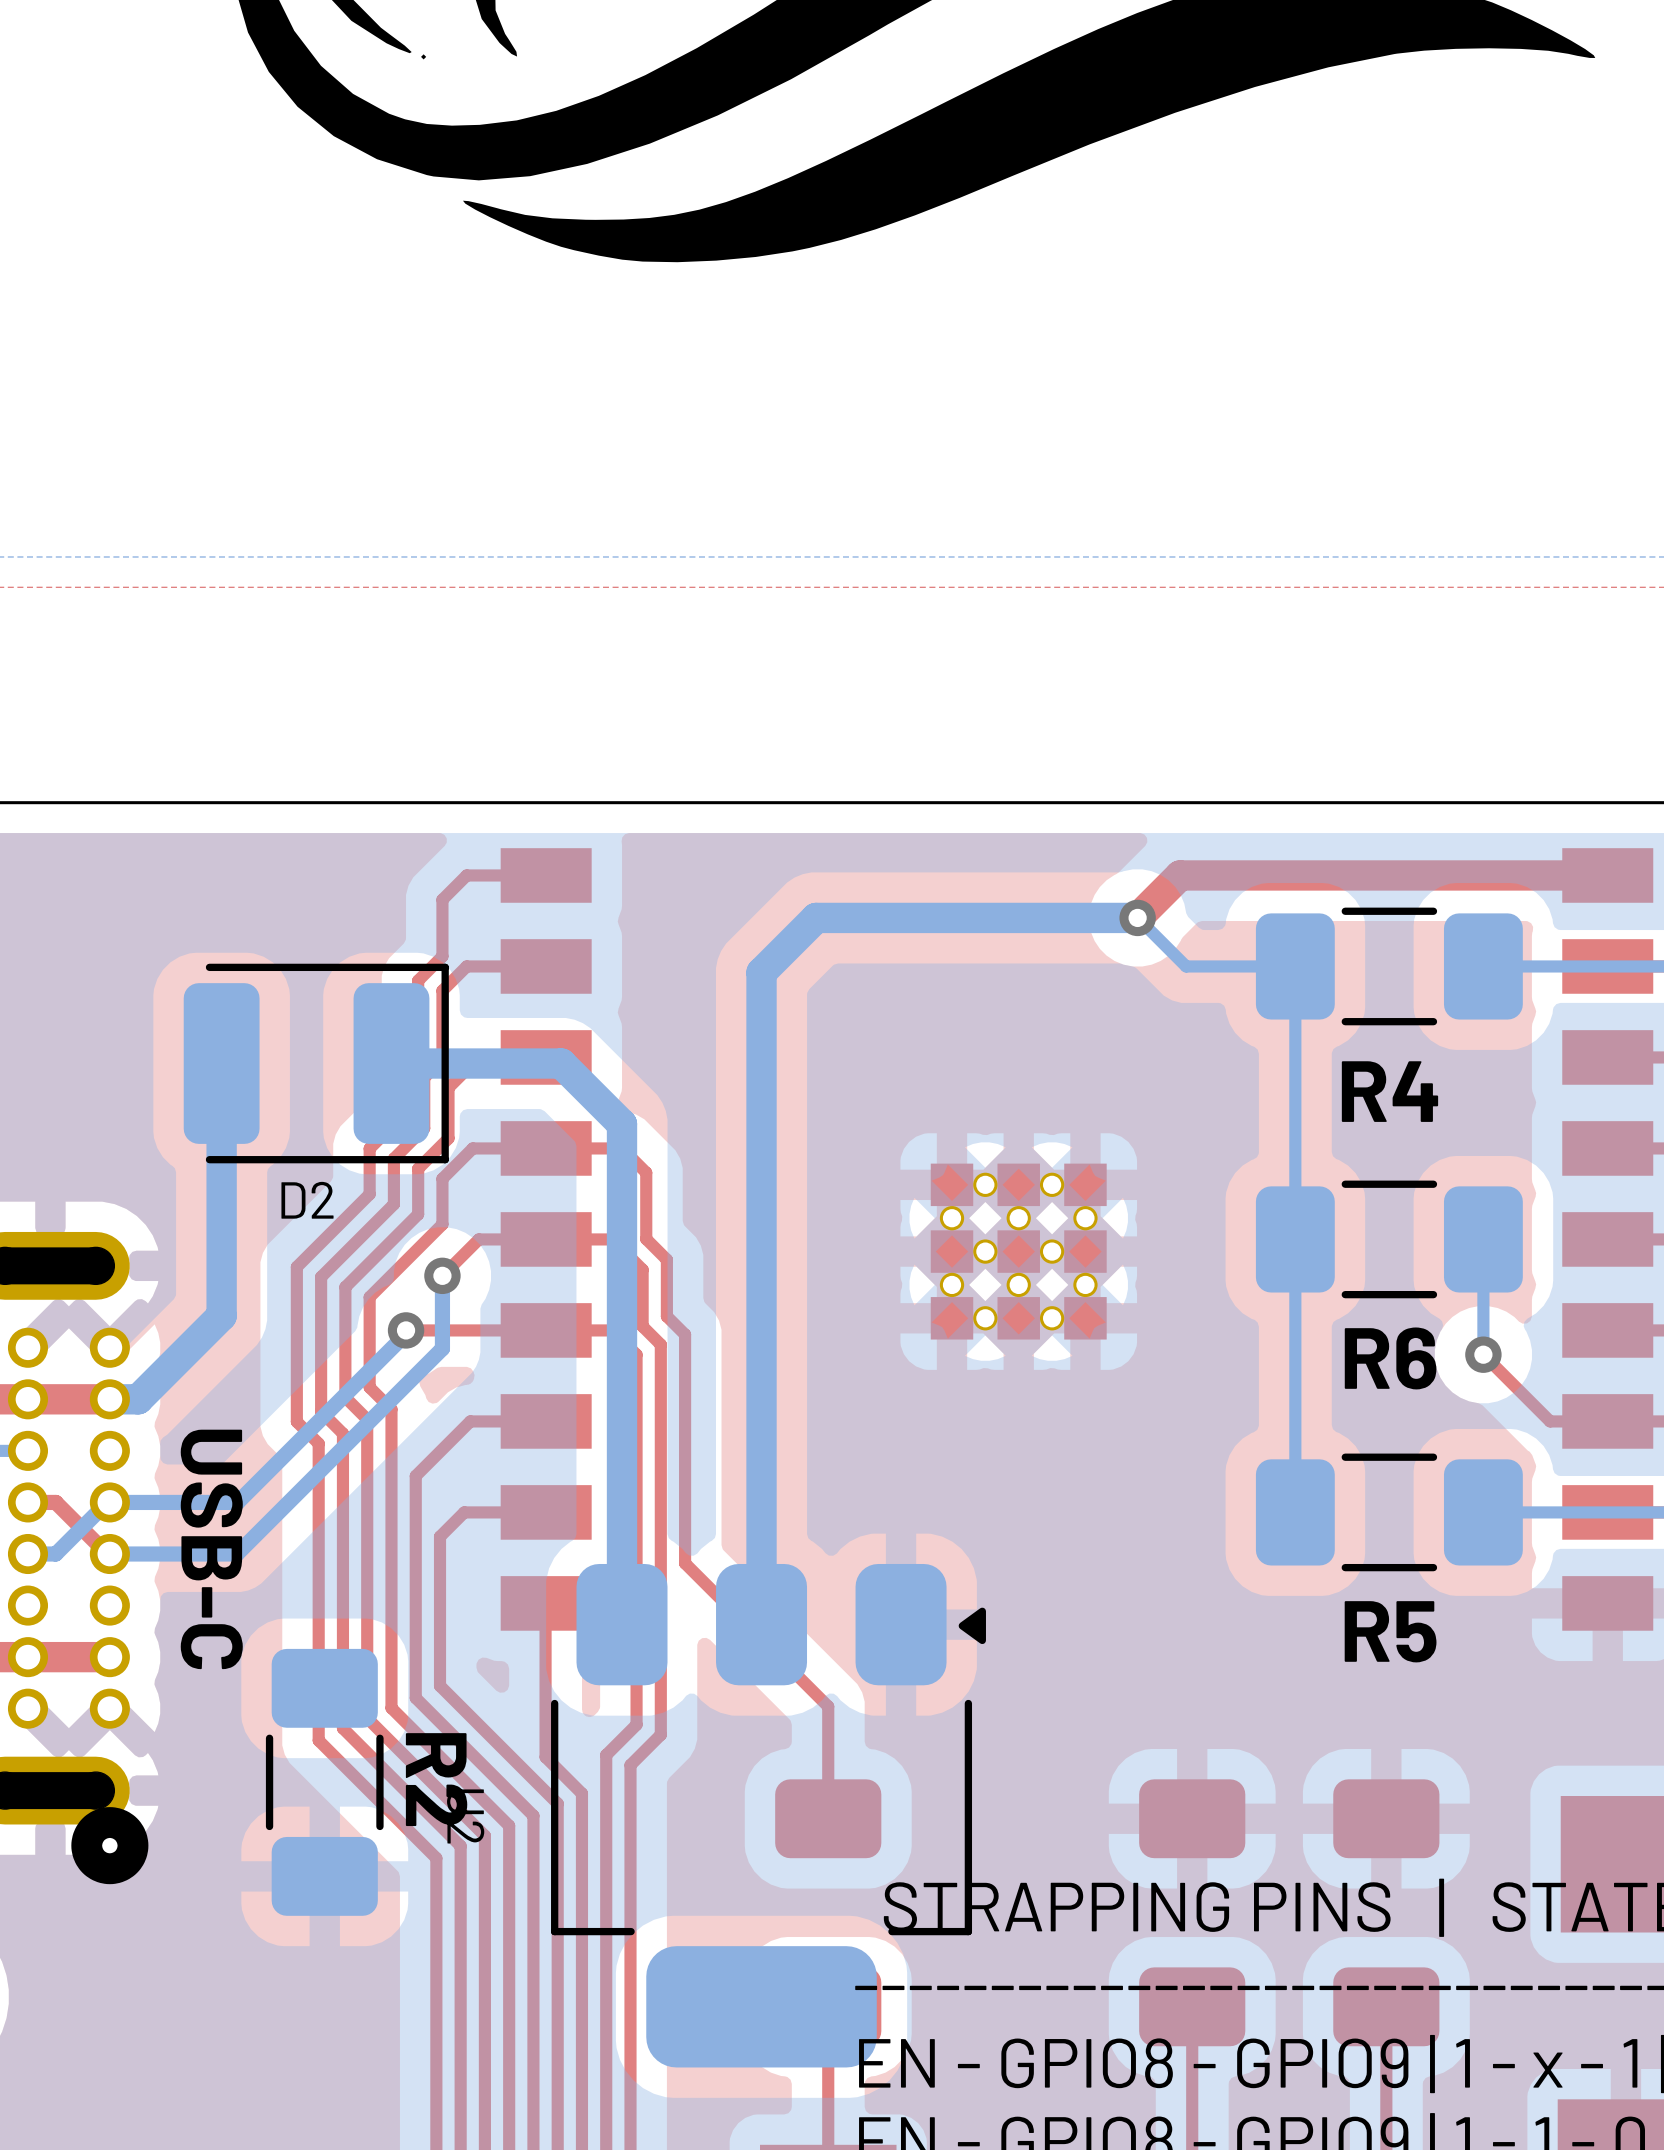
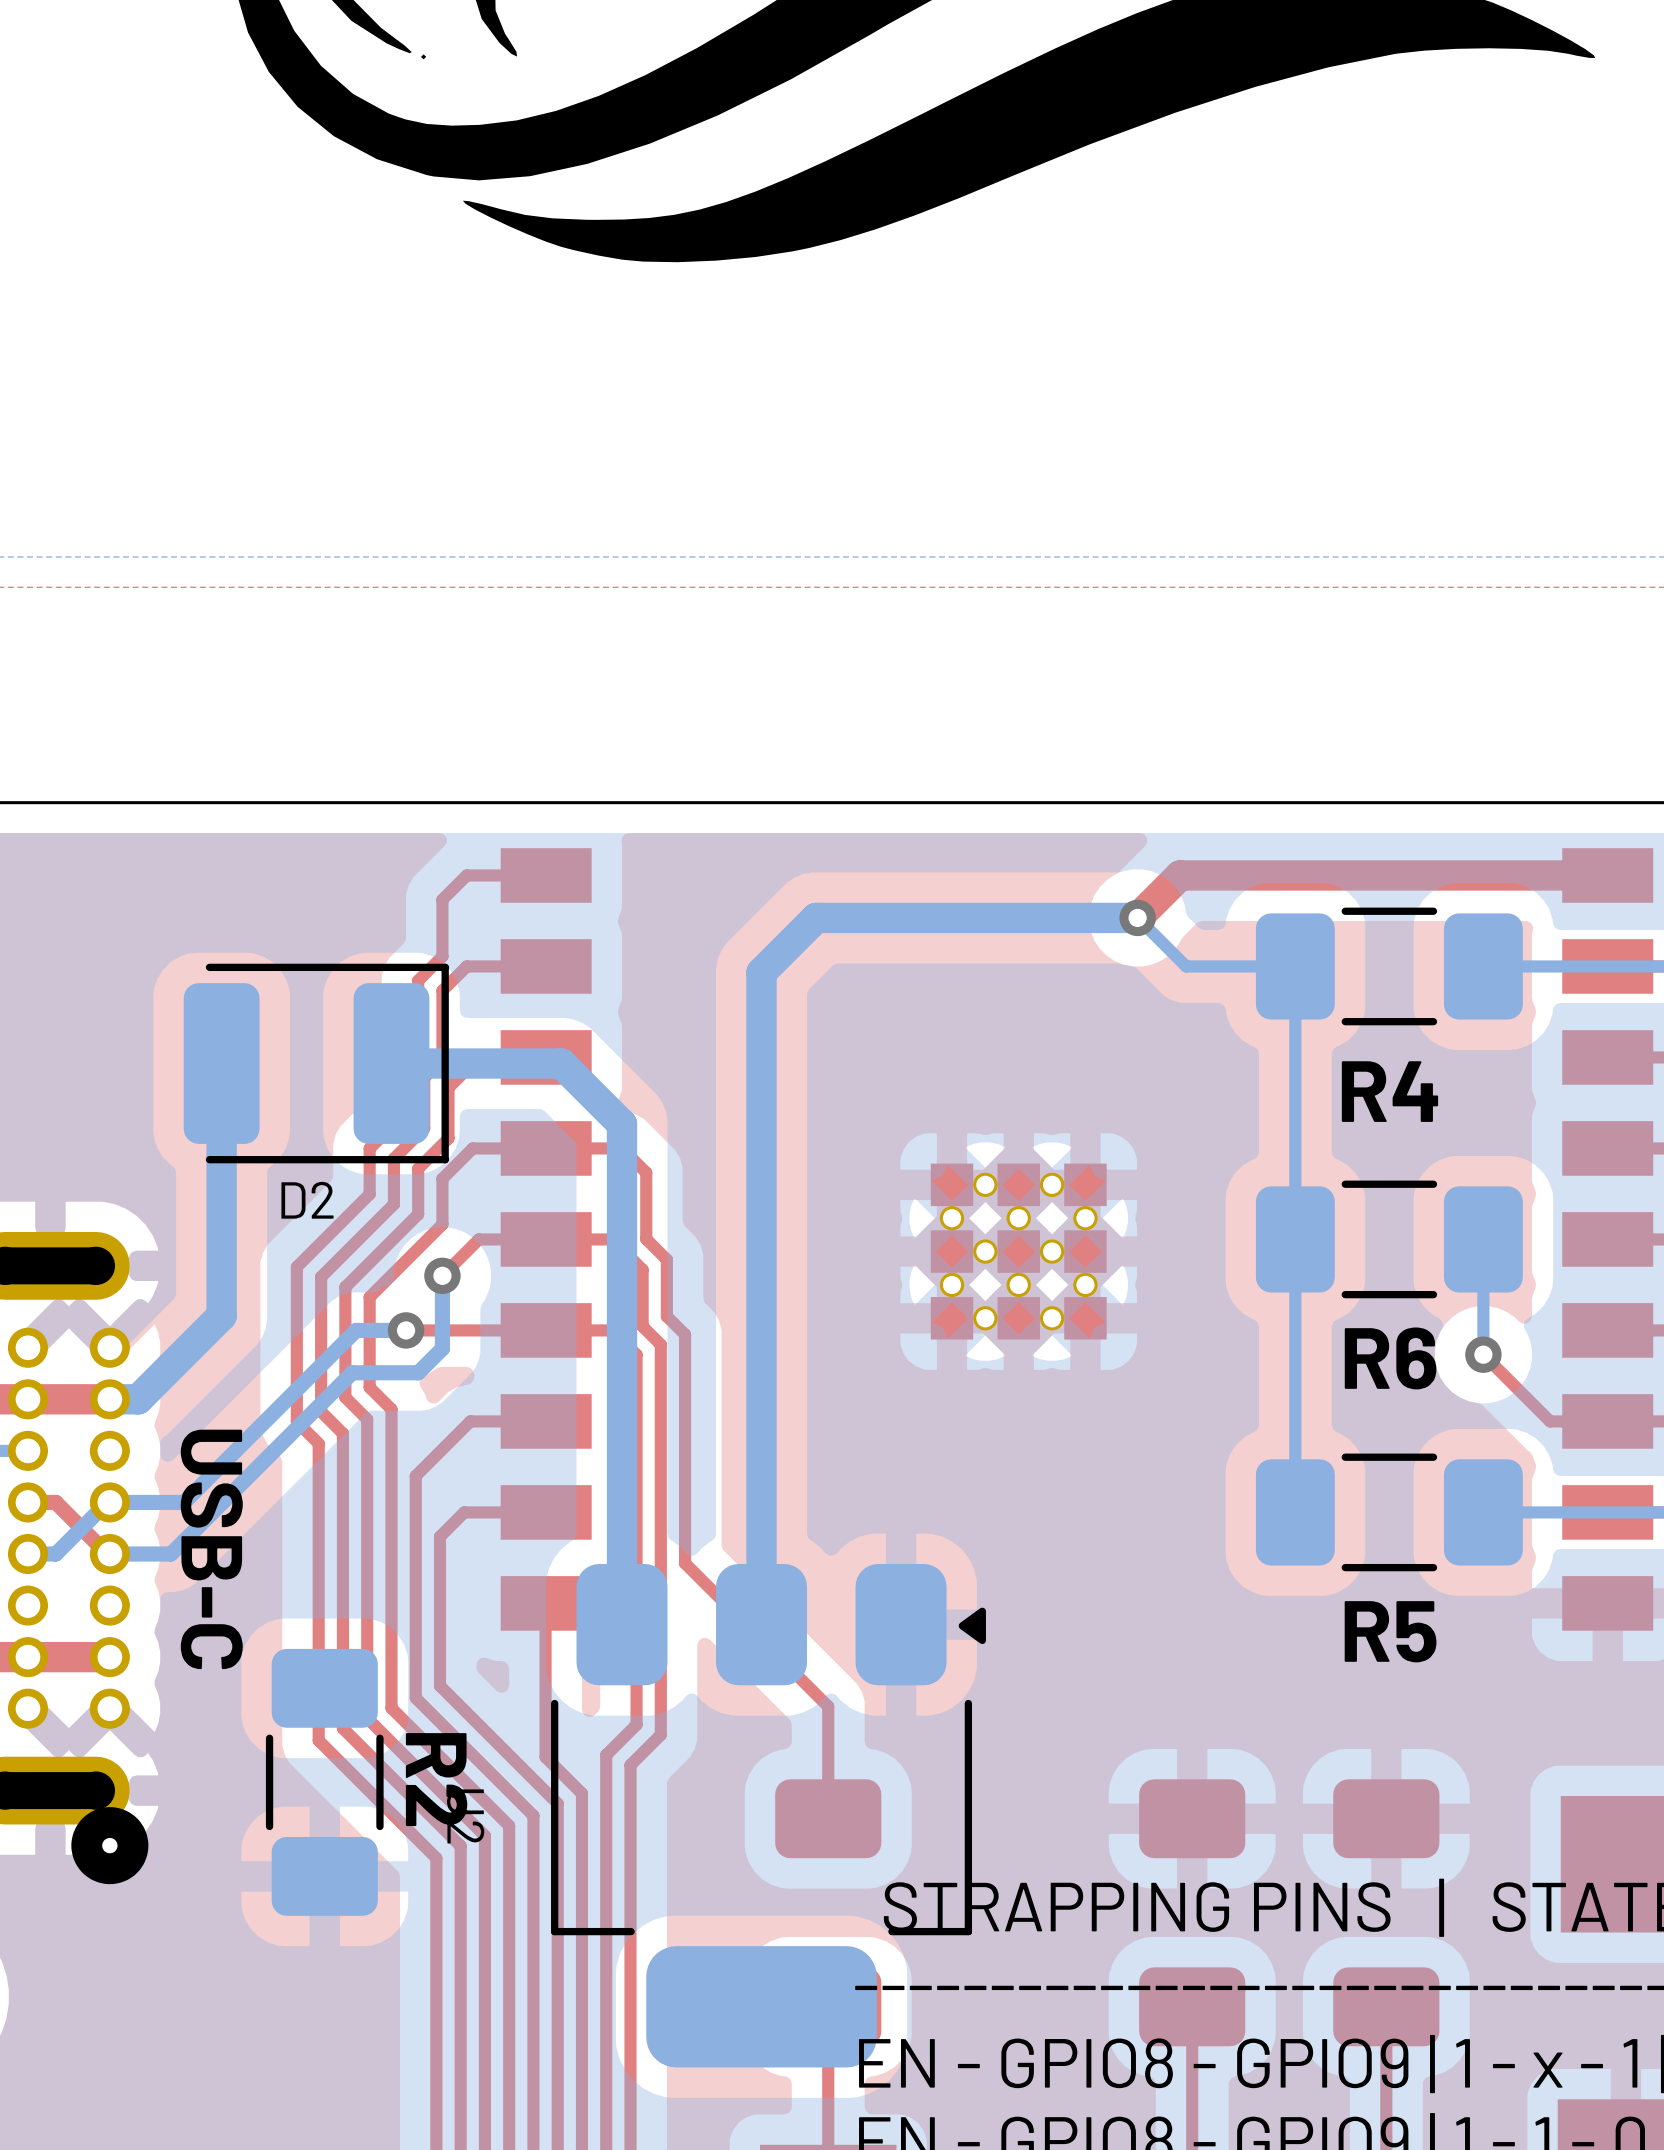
bottom track: (406, 1330) (406, 1334) (237, 1502) (184, 1502) -> (406, 1330) (356, 1330) (184, 1502)
bottom track: (418, 1372) (237, 1554) (171, 1554) -> (418, 1372) (352, 1372) (171, 1554)

